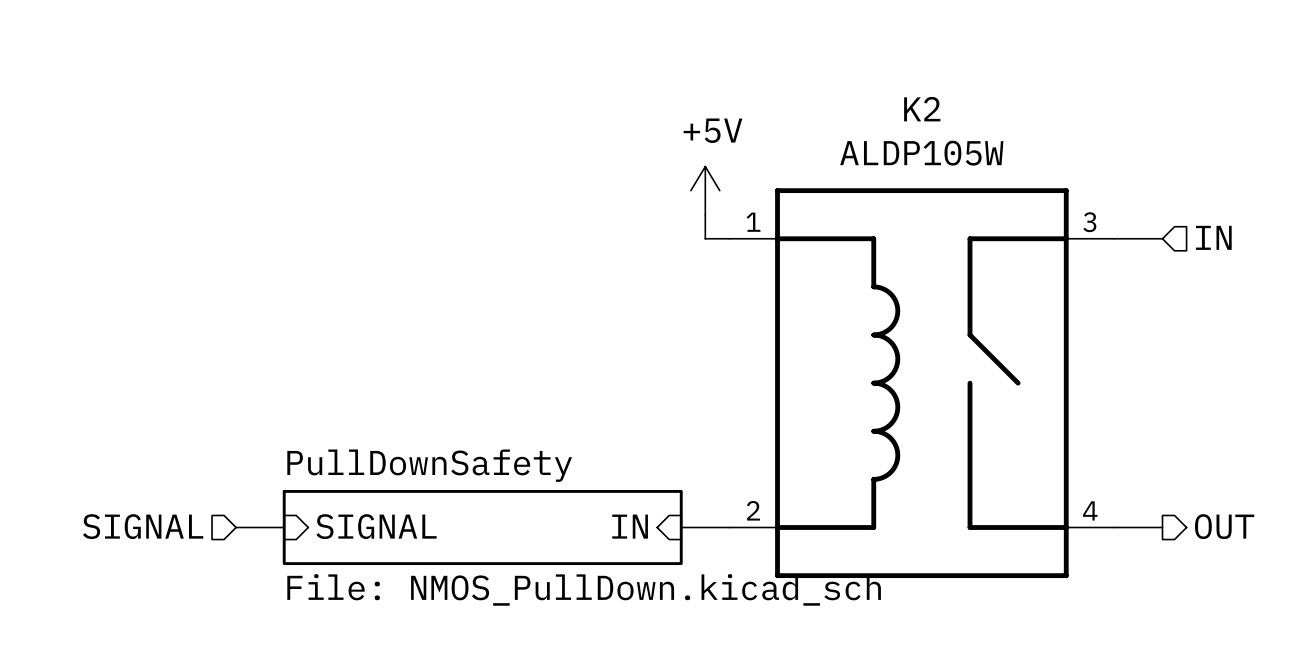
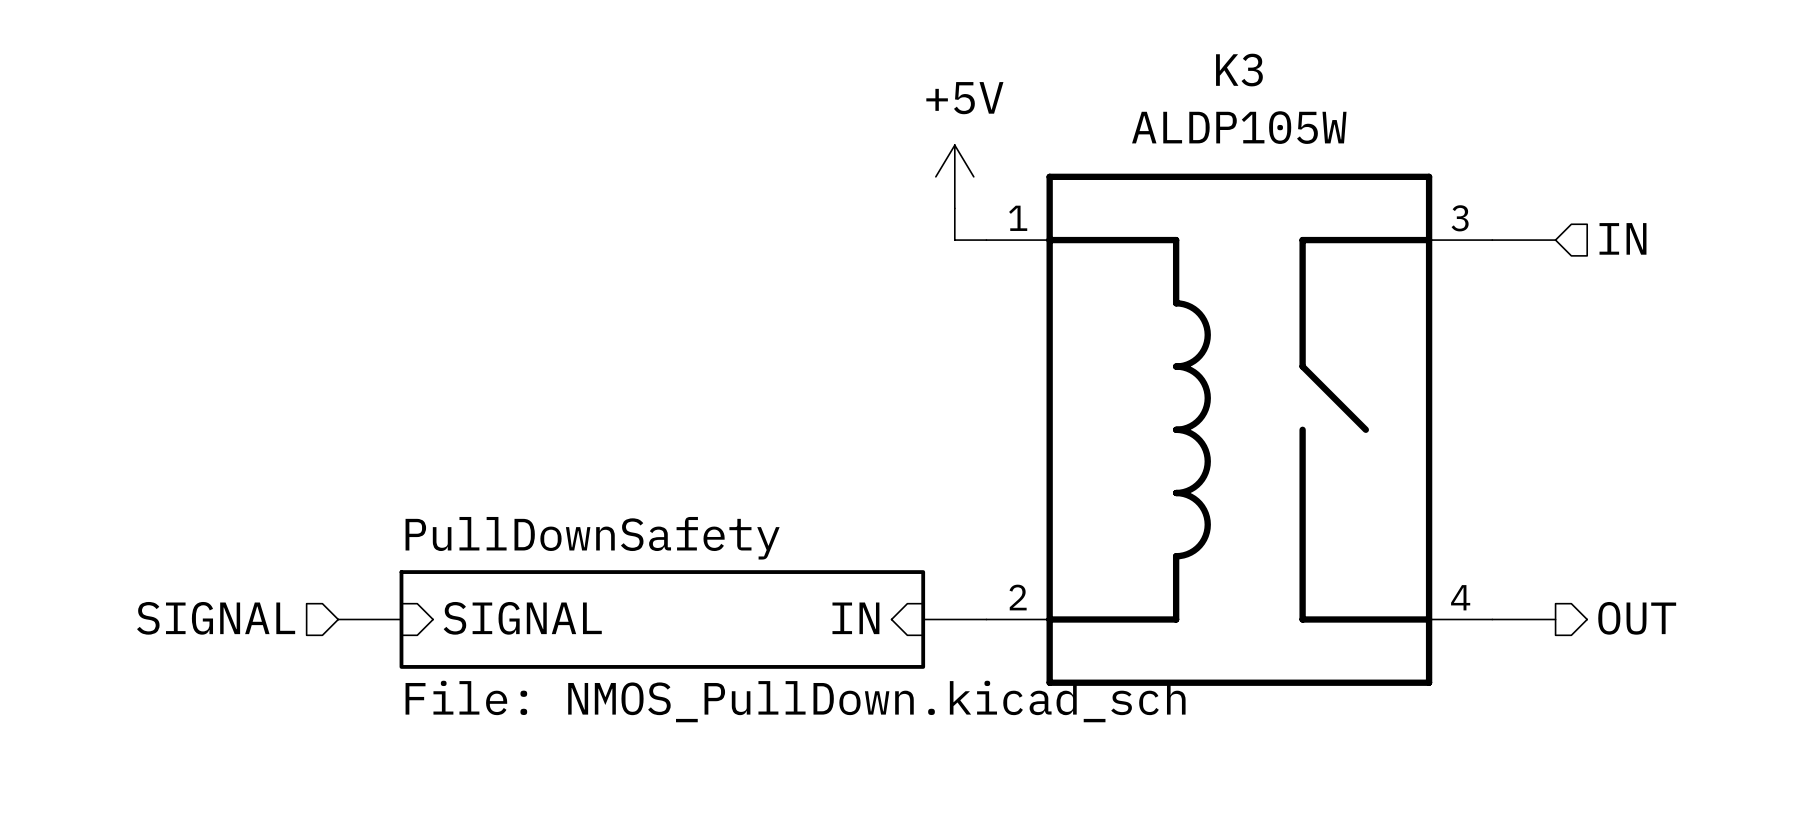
K2 name: K2 (922, 109) -> K3 (1239, 70)

